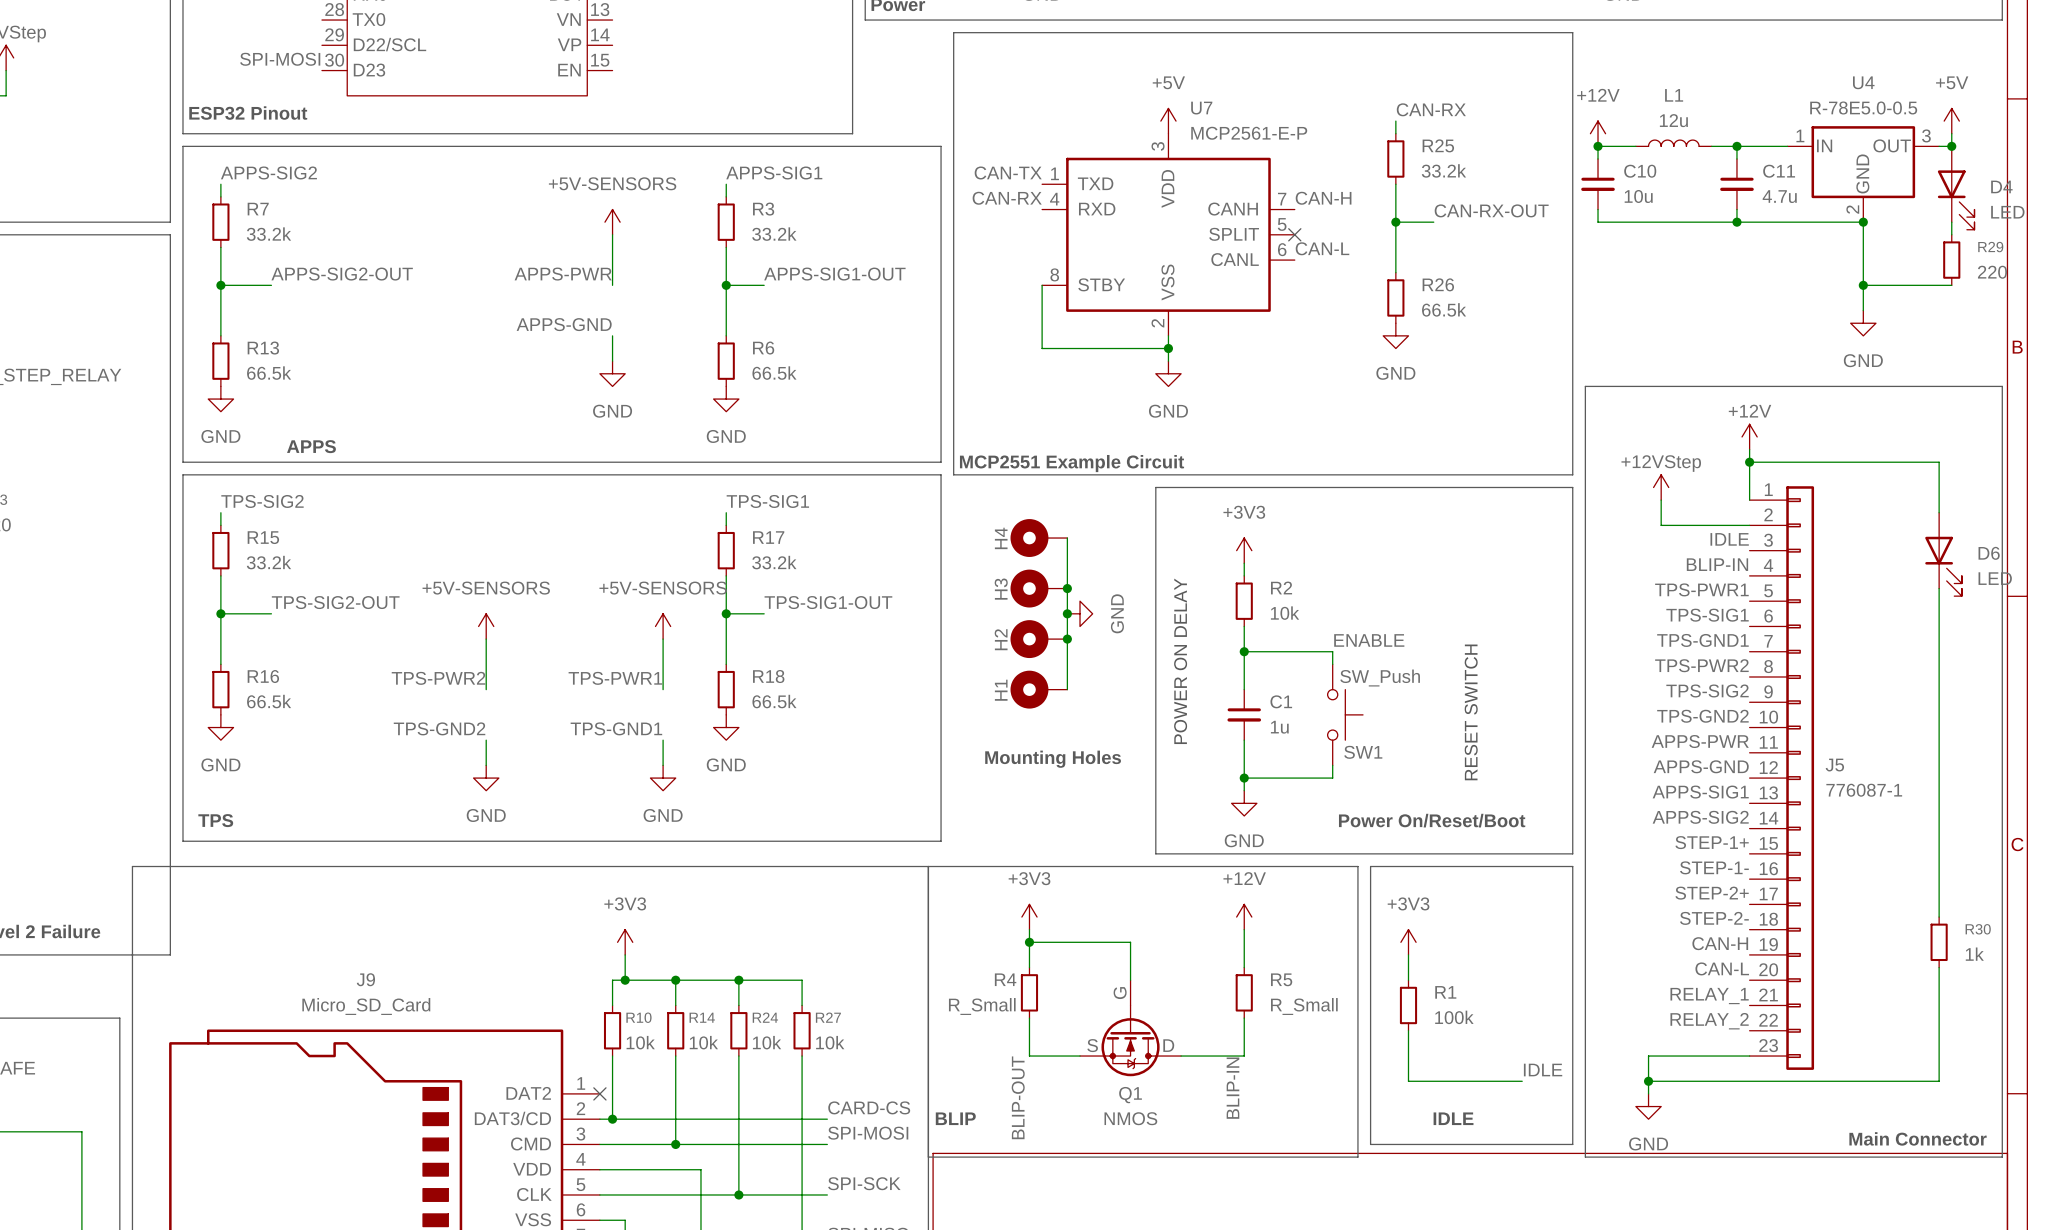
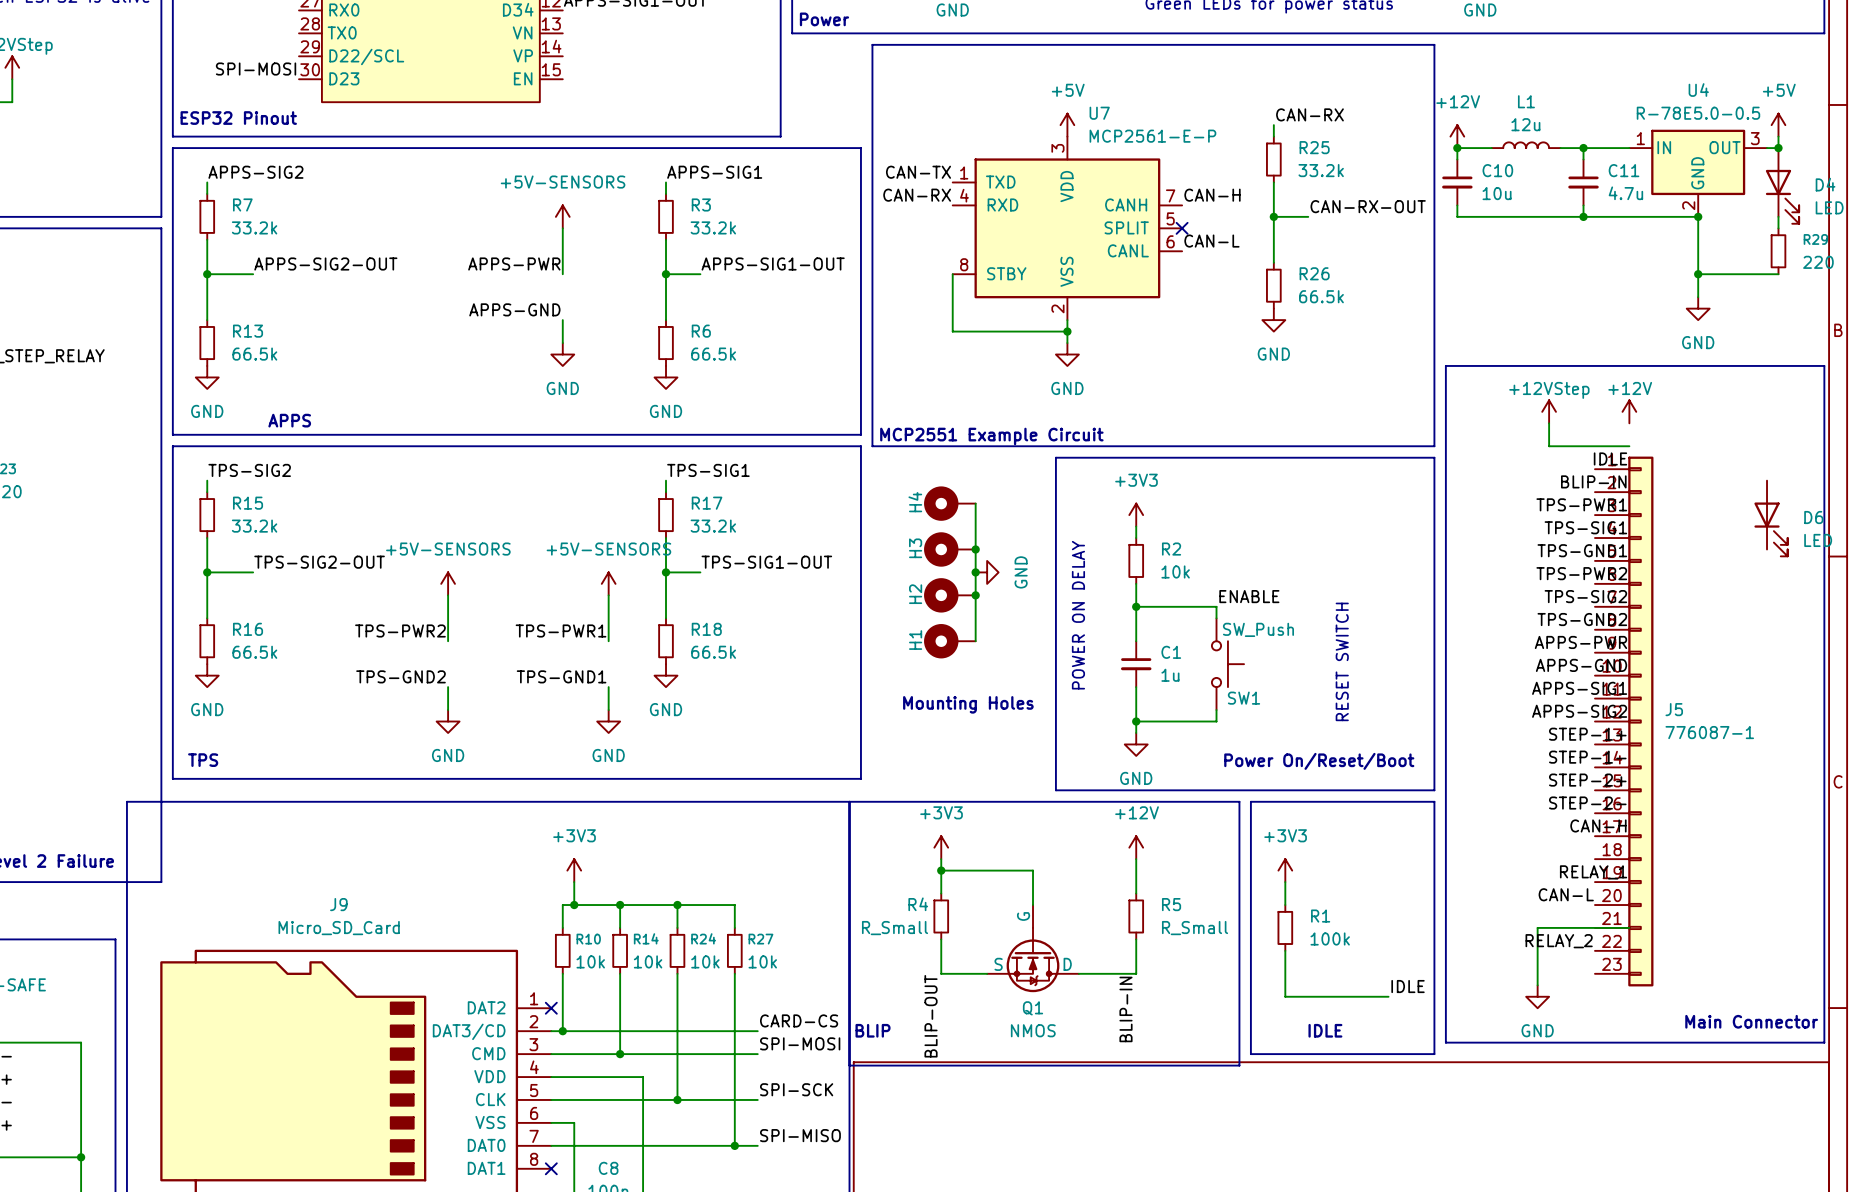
power symbol position: +12V (1749, 436) -> +12V (1629, 411)
wire: (1749, 449) (1749, 500) -> none
wire: (1749, 462) (1939, 462) (1939, 512) -> none
junction: (1749, 462) -> none
power symbol position: +12VStep (1661, 487) -> +12VStep (1549, 411)
wire: (1661, 500) (1661, 525) (1749, 525) -> (1549, 423) (1549, 446) (1629, 446)
label position: IDLE (1729, 539) -> IDLE (1610, 458)
label position: BLIP-IN (1717, 564) -> BLIP-IN (1593, 481)
wire: (1939, 588) (1939, 917) -> none
label position: TPS-PWR1 (1701, 589) -> TPS-PWR1 (1581, 504)
label position: TPS-SIG1 (1707, 615) -> TPS-SIG1 (1585, 527)
label position: TPS-GND1 (1702, 640) -> TPS-GND1 (1582, 550)
label position: TPS-PWR2 (1701, 665) -> TPS-PWR2 (1581, 573)
label position: TPS-SIG2 (1707, 690) -> TPS-SIG2 (1585, 596)
label position: TPS-GND2 (1702, 716) -> TPS-GND2 (1582, 619)
label position: APPS-PWR (1700, 741) -> APPS-PWR (1580, 642)
label position: APPS-GND (1701, 766) -> APPS-GND (1581, 665)
label position: APPS-SIG1 (1700, 792) -> APPS-SIG1 (1579, 688)
label position: APPS-SIG2 (1700, 817) -> APPS-SIG2 (1579, 711)
label position: STEP-1+ (1712, 842) -> STEP-1+ (1587, 734)
label position: STEP-1- (1714, 867) -> STEP-1- (1587, 757)
label position: STEP-2+ (1712, 893) -> STEP-2+ (1587, 780)
label position: STEP-2- (1714, 918) -> STEP-2- (1587, 803)
R30: 1k (1939, 942) -> none
label position: CAN-H (1720, 943) -> CAN-H (1598, 825)
wire: (1939, 967) (1939, 1081) (1648, 1081) -> none
label position: RELAY_1 (1709, 996) -> RELAY_1 (1593, 872)
wire: none -> (1629, 927) (1537, 927) (1537, 985)
wire: (1749, 1056) (1648, 1056) (1648, 1093) -> none
junction: (1648, 1081) -> none
power symbol position: GND (1648, 1106) -> GND (1537, 996)
line: (1585, 1131) (1585, 1157) (2002, 1157) (2002, 1131) -> (1445, 1042) (1824, 1042)
text position: Main Connector (1918, 1138) -> Main Connector (1751, 1021)

